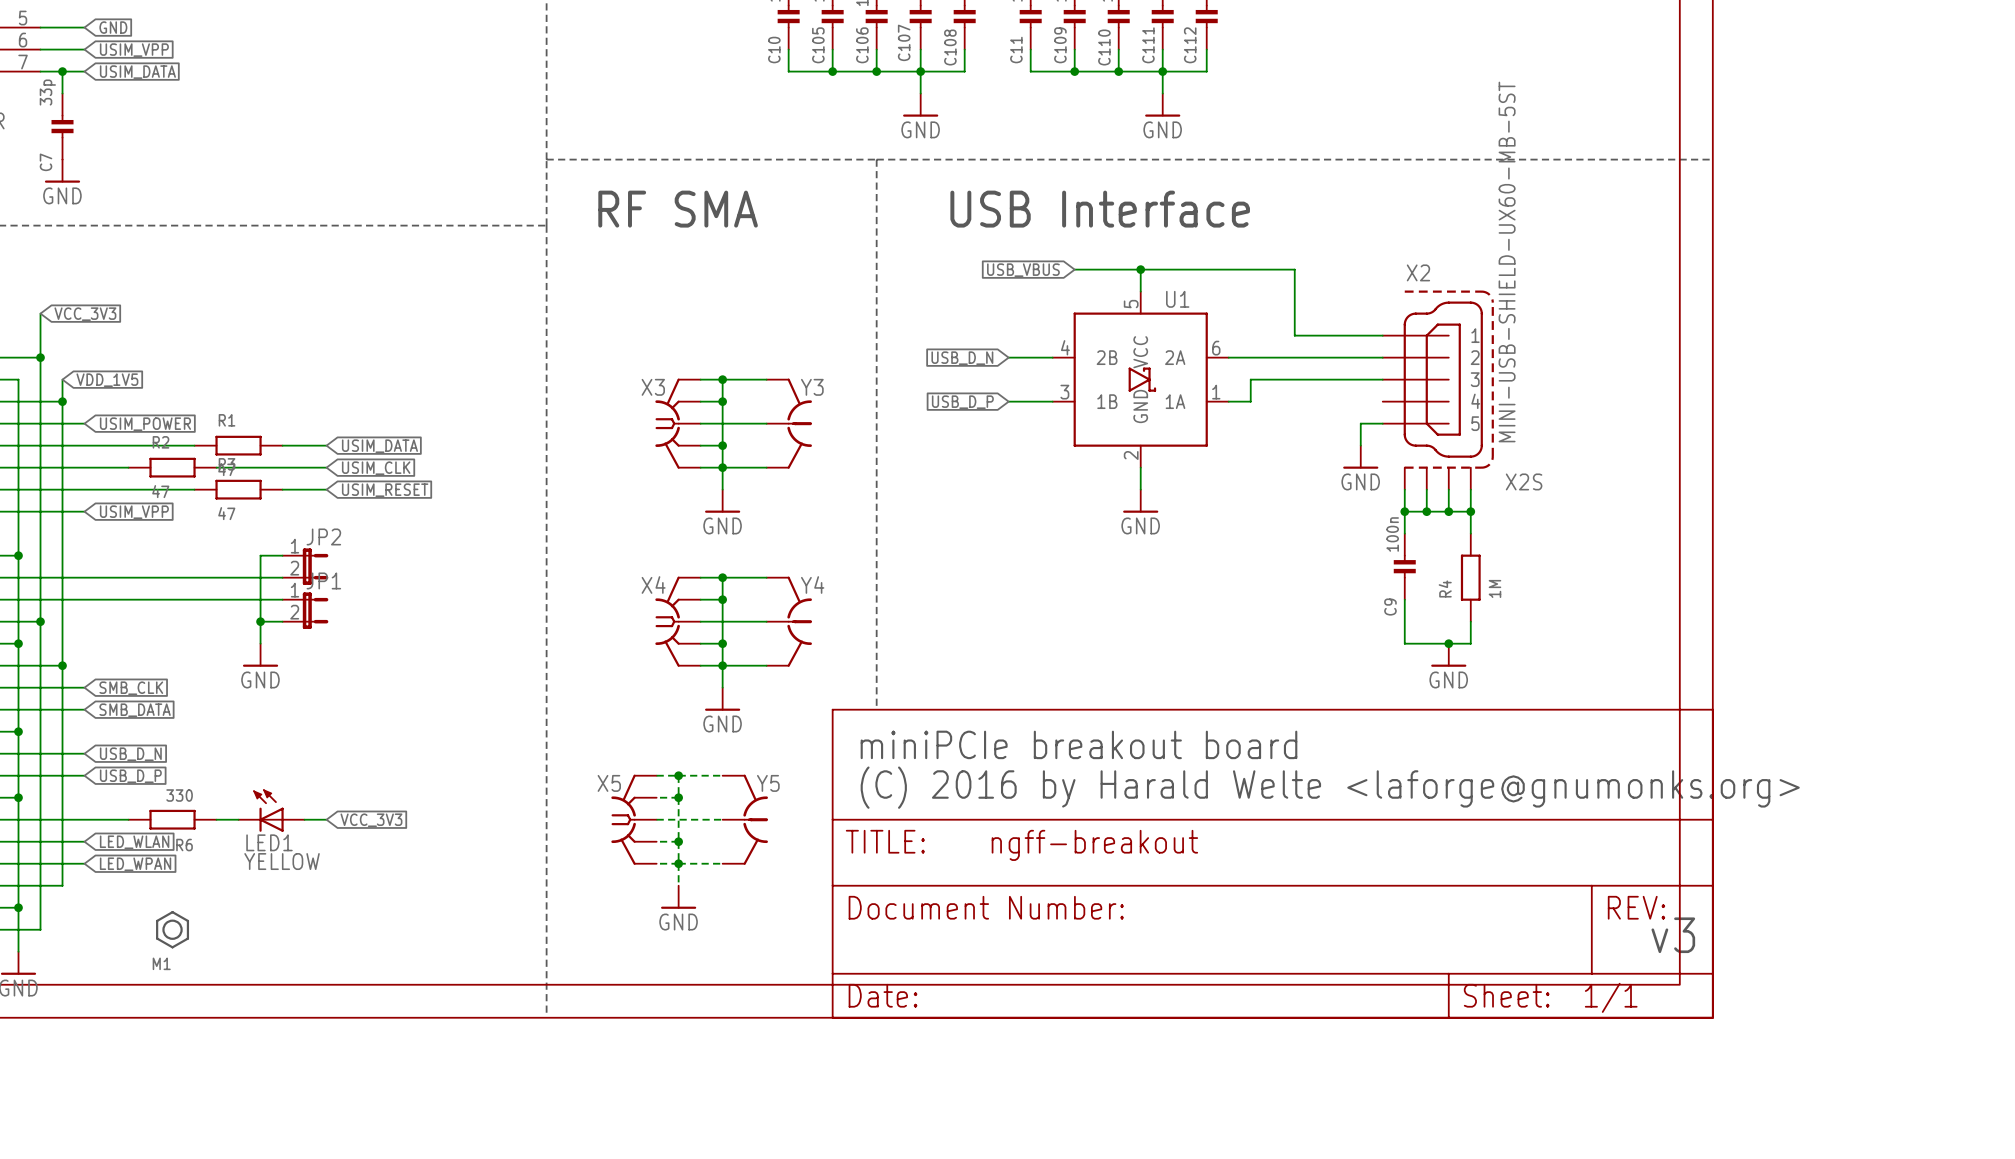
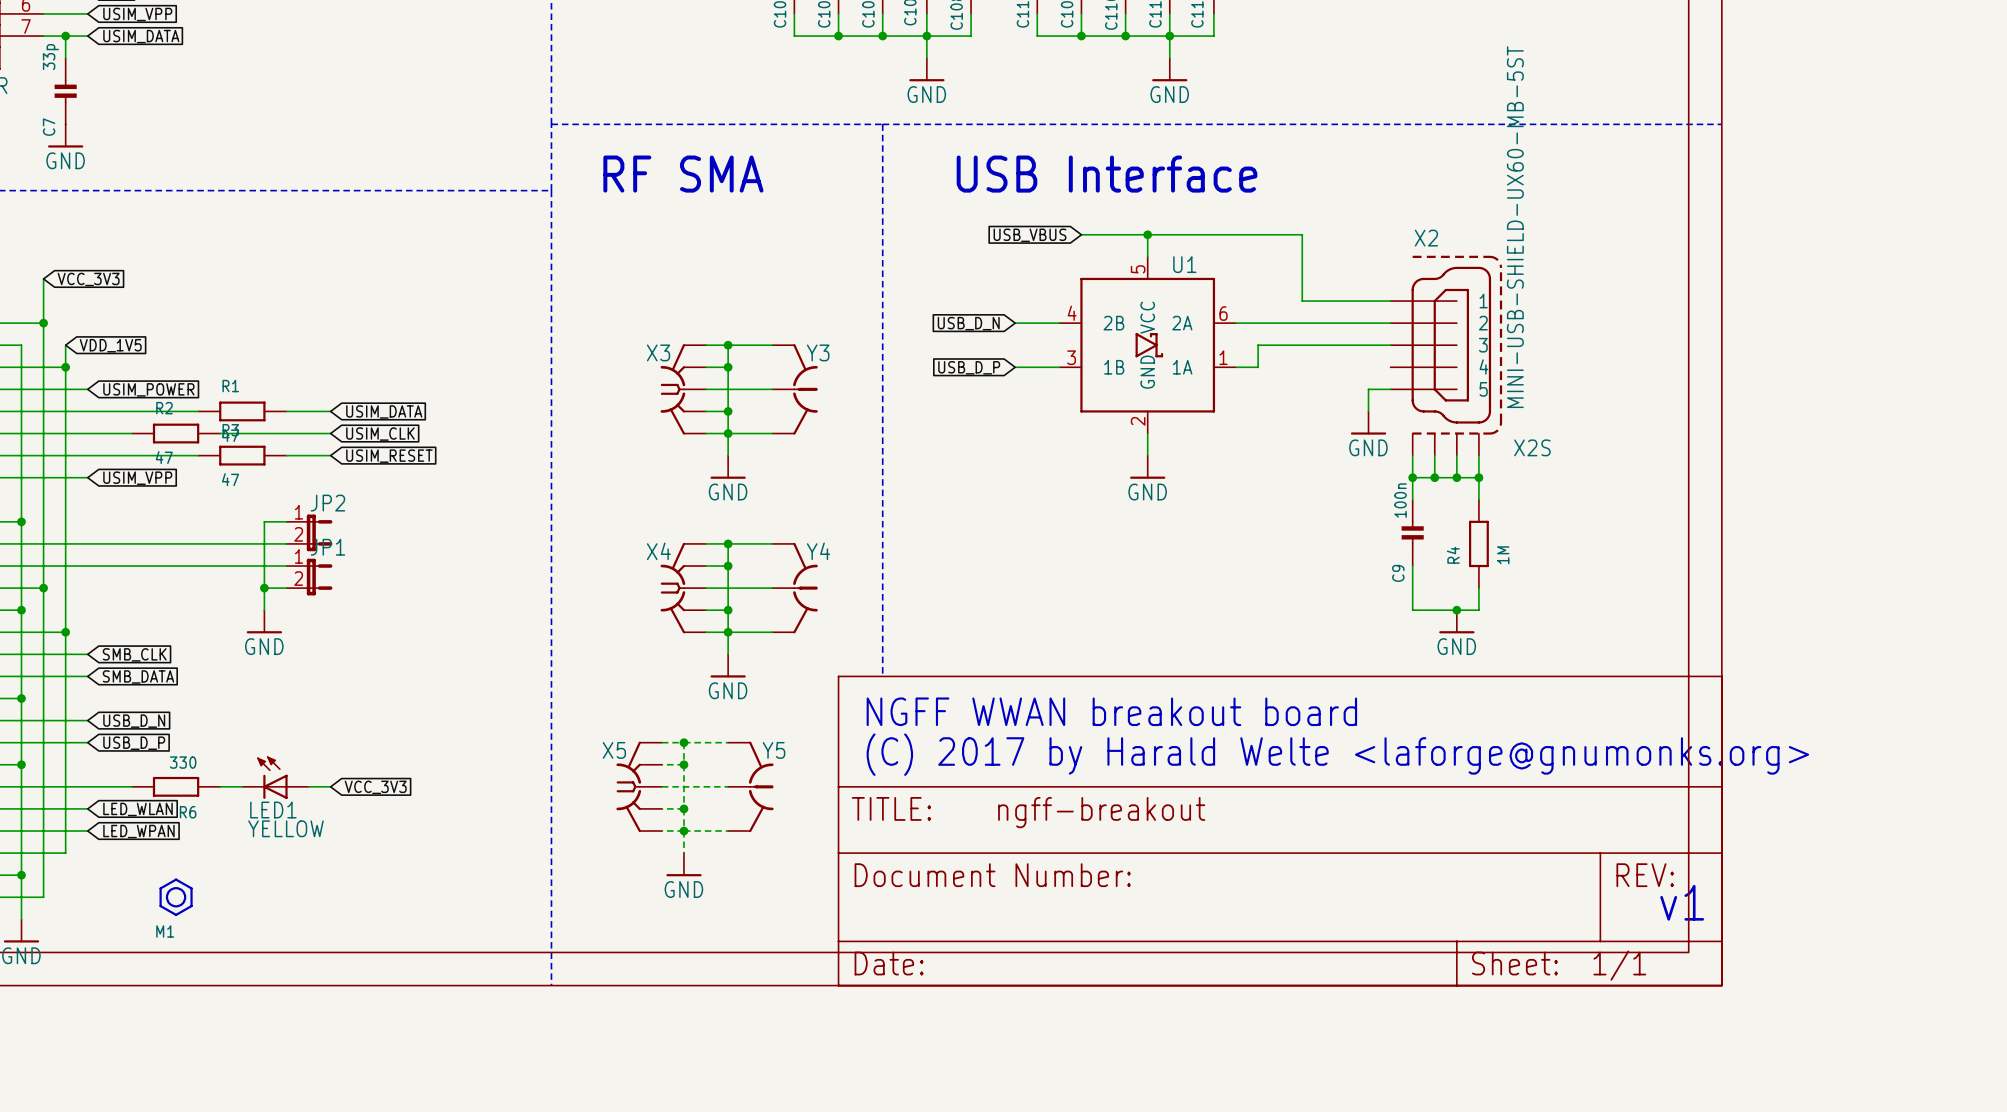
text: miniPCIe breakout board (1078, 744) -> NGFF WWAN breakout board (1111, 711)
text: (C) 2016 by Harald Welte <laforge@gnumonks.org> (1330, 787) -> (C) 2017 by Harald Welte <laforge@gnumonks.org> (1337, 754)
text: v3 (1673, 935) -> v1 (1682, 902)

